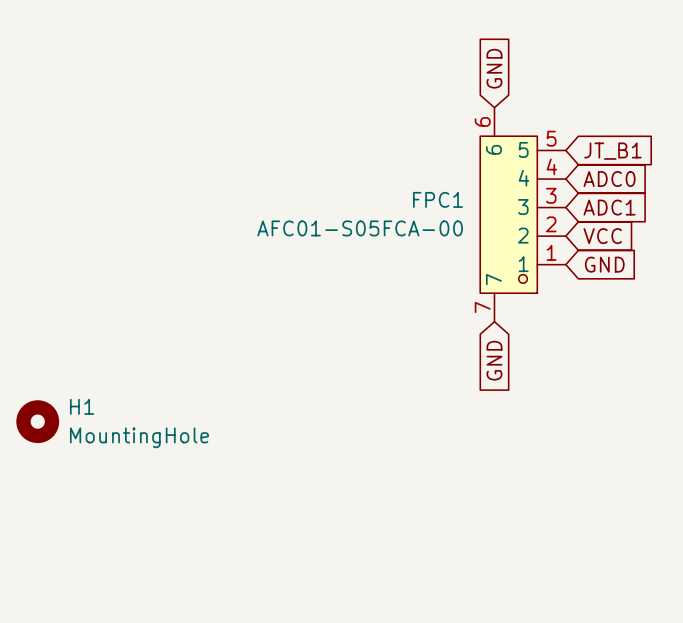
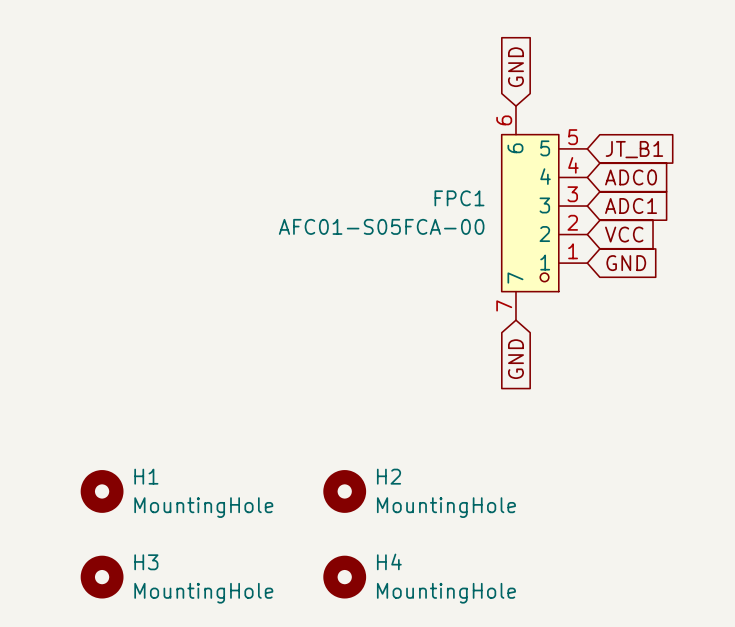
H1 position: (37, 421) -> (102, 491)
H2: none -> MountingHole (344, 491)
H3: none -> MountingHole (102, 577)
H4: none -> MountingHole (344, 577)

